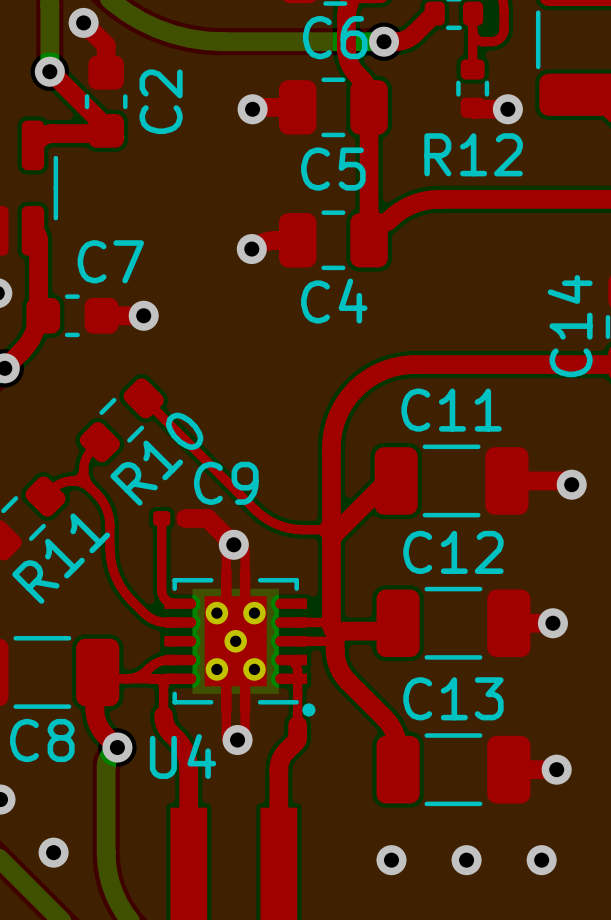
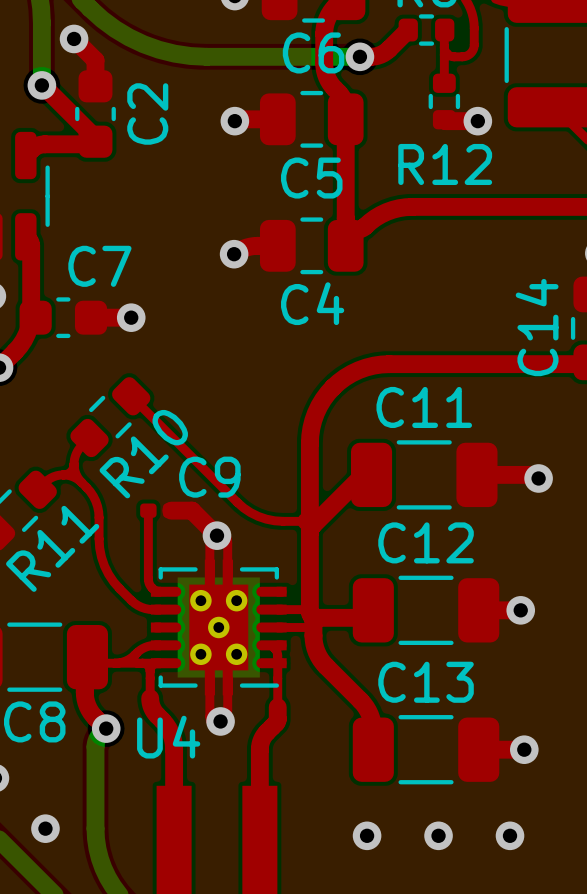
drawing: [302, 703, 316, 717] -> none

